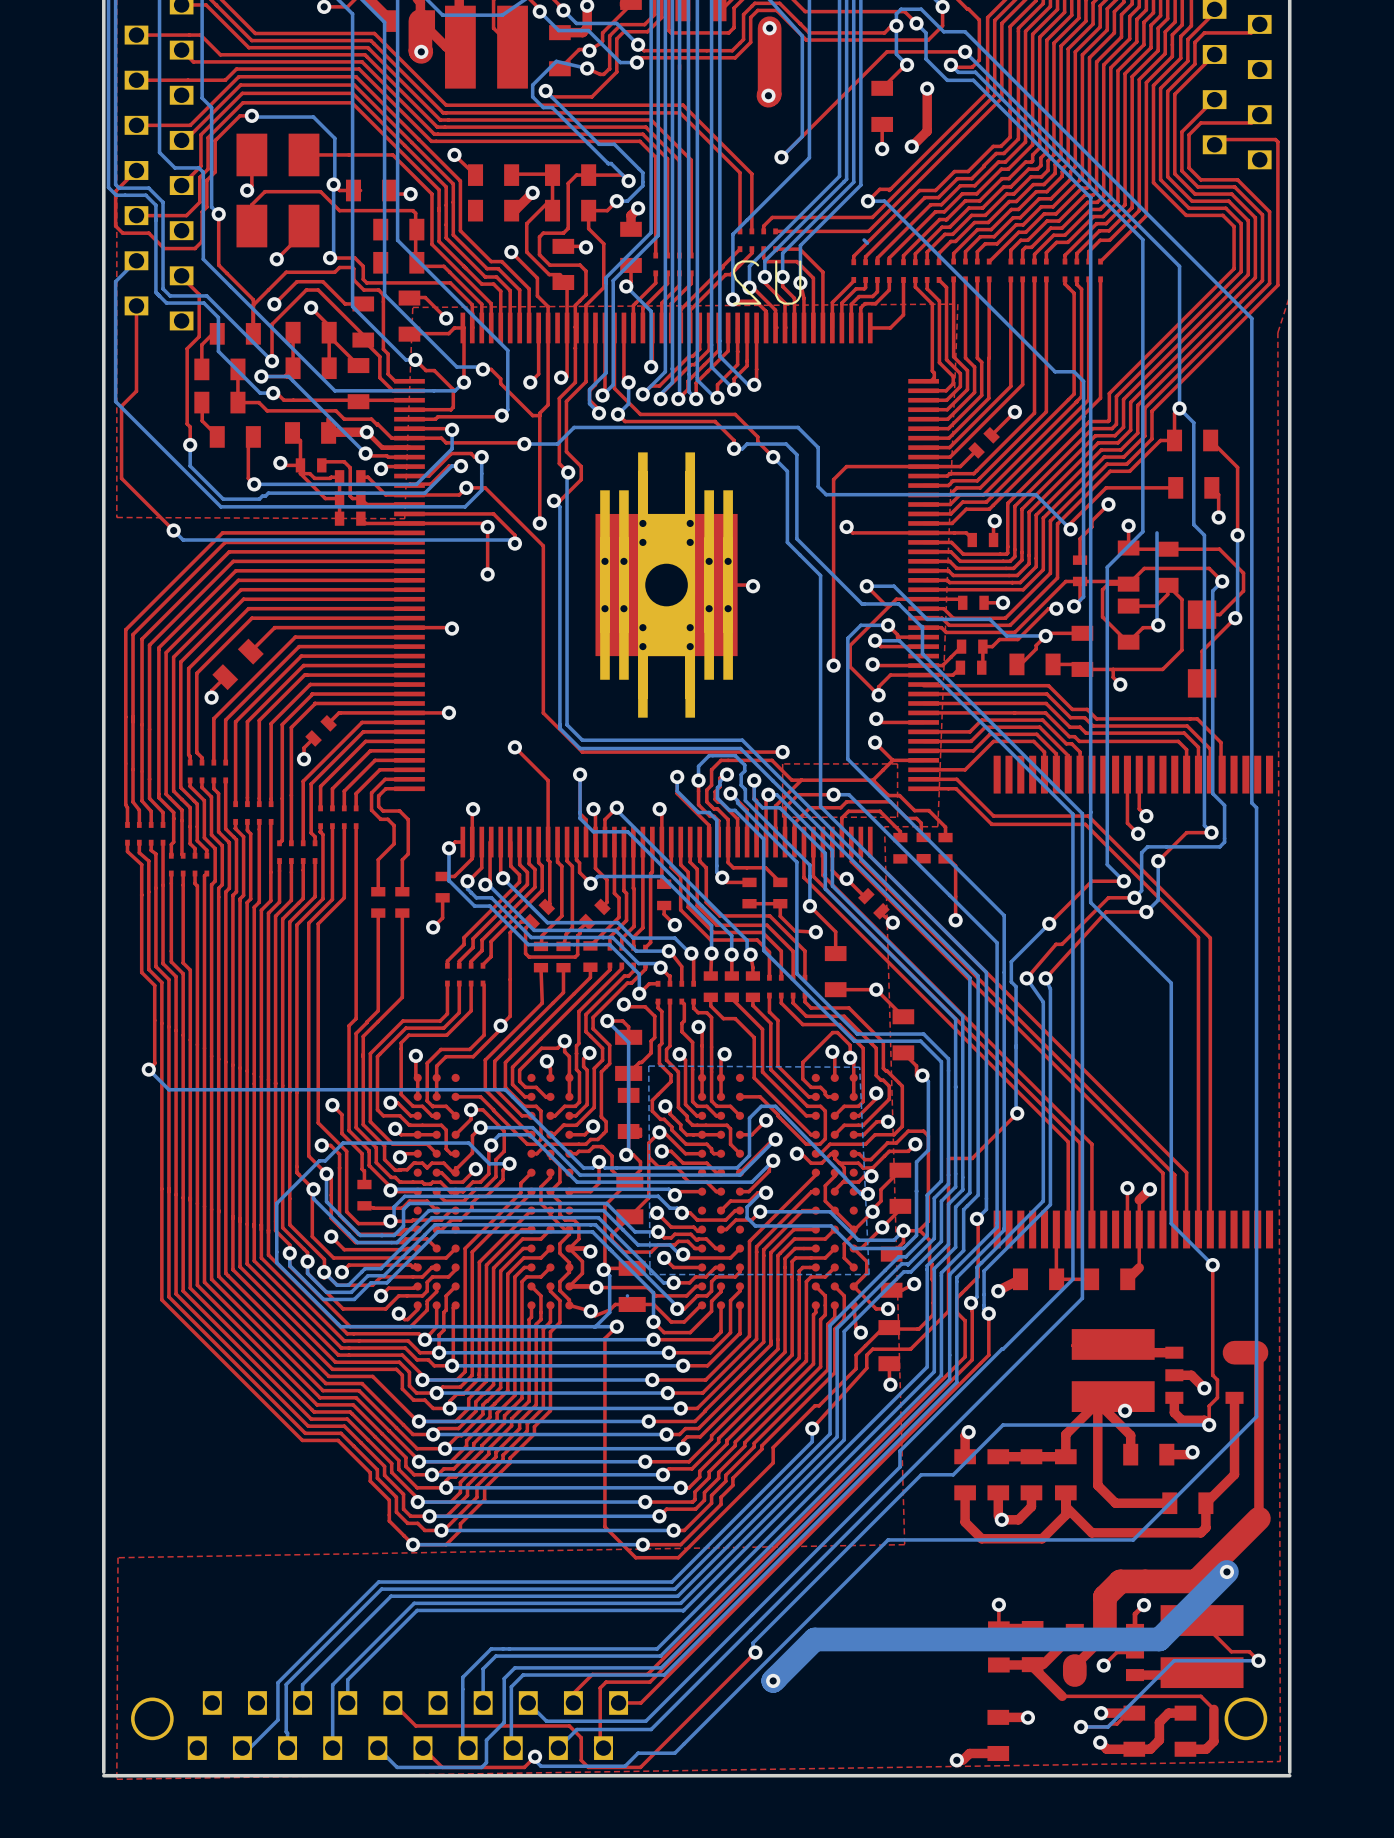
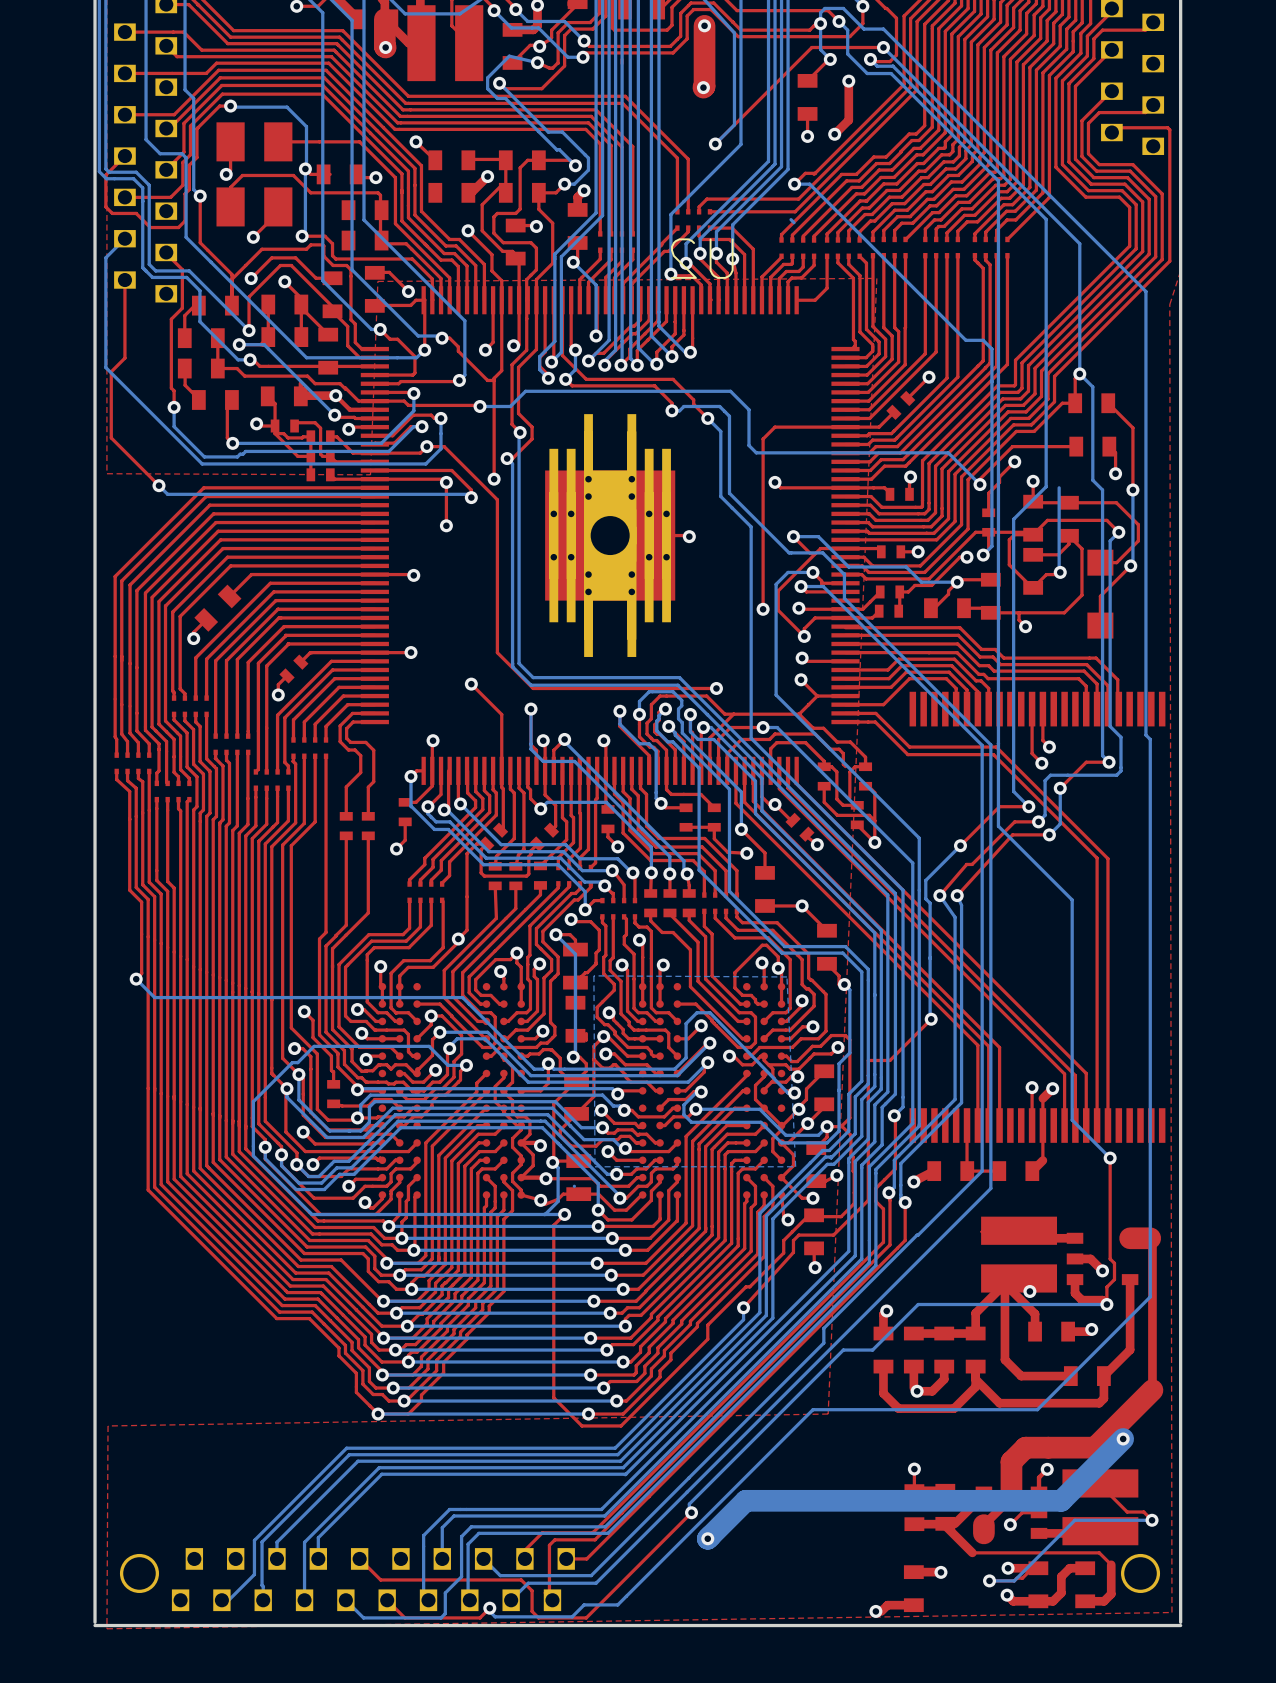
top zone outline: (957, 304) (937, 826) (884, 826) (904, 1544) -> (876, 278) (828, 1414)
top zone outline: (897, 763) (782, 763) (782, 817) (897, 817) (897, 763) -> none
top track: none -> (824, 766) (831, 766) (836, 771) (836, 799) (843, 805) (857, 805) (853, 805)
top track: none -> (865, 766) (855, 766) (849, 771) (849, 797)
part position: (923, 848) -> (857, 815)
top track: none -> (824, 786) (824, 802) (837, 815) (869, 815) (874, 820)
top track: none -> (857, 824) (874, 842)

